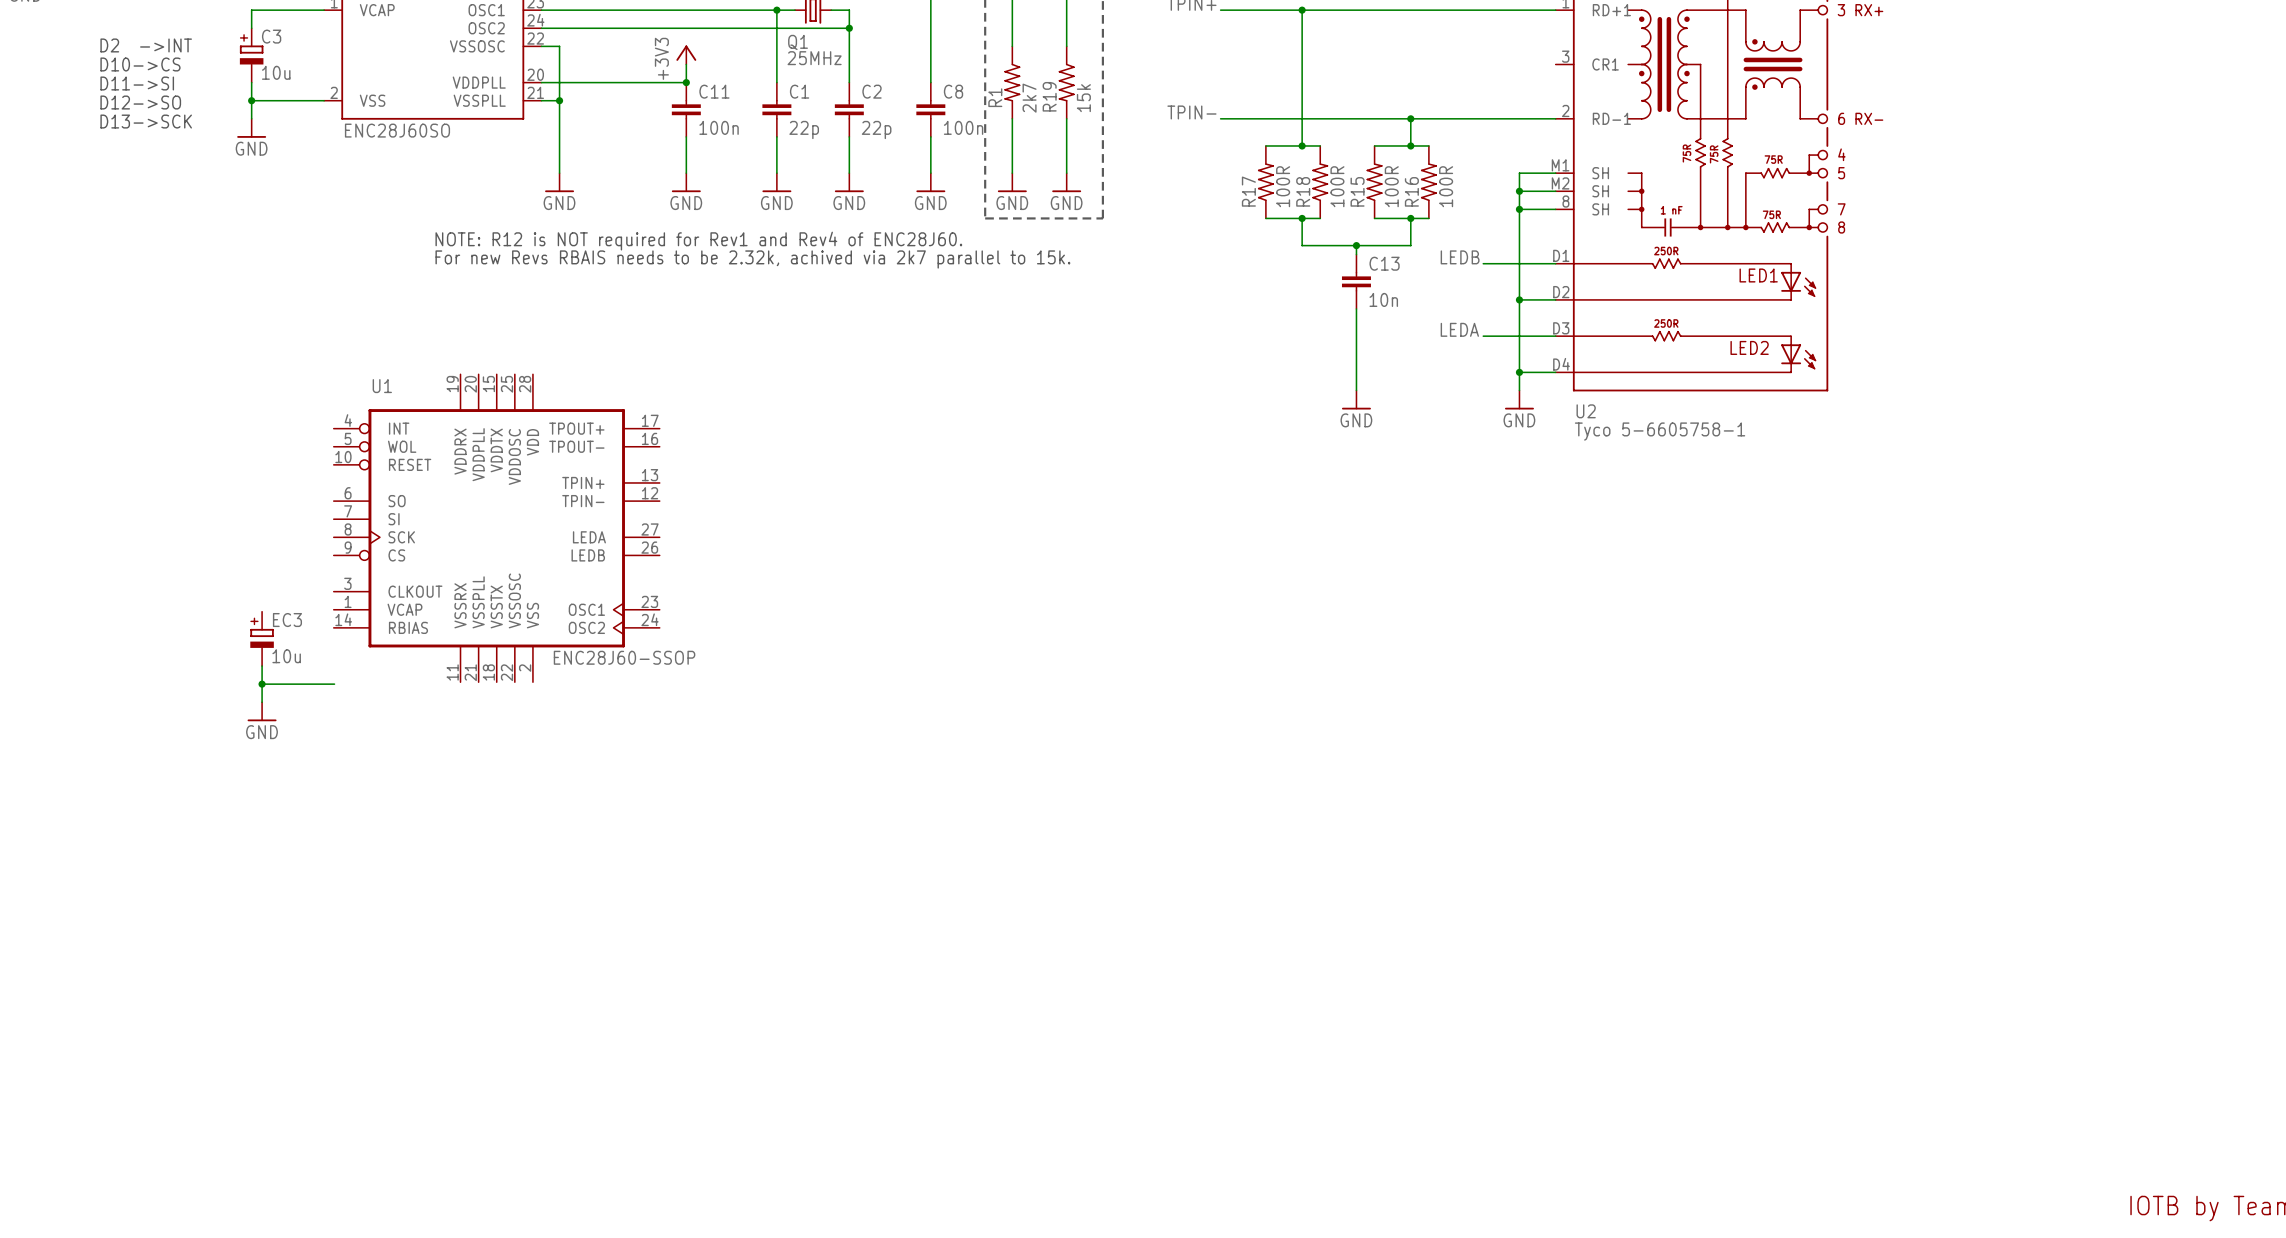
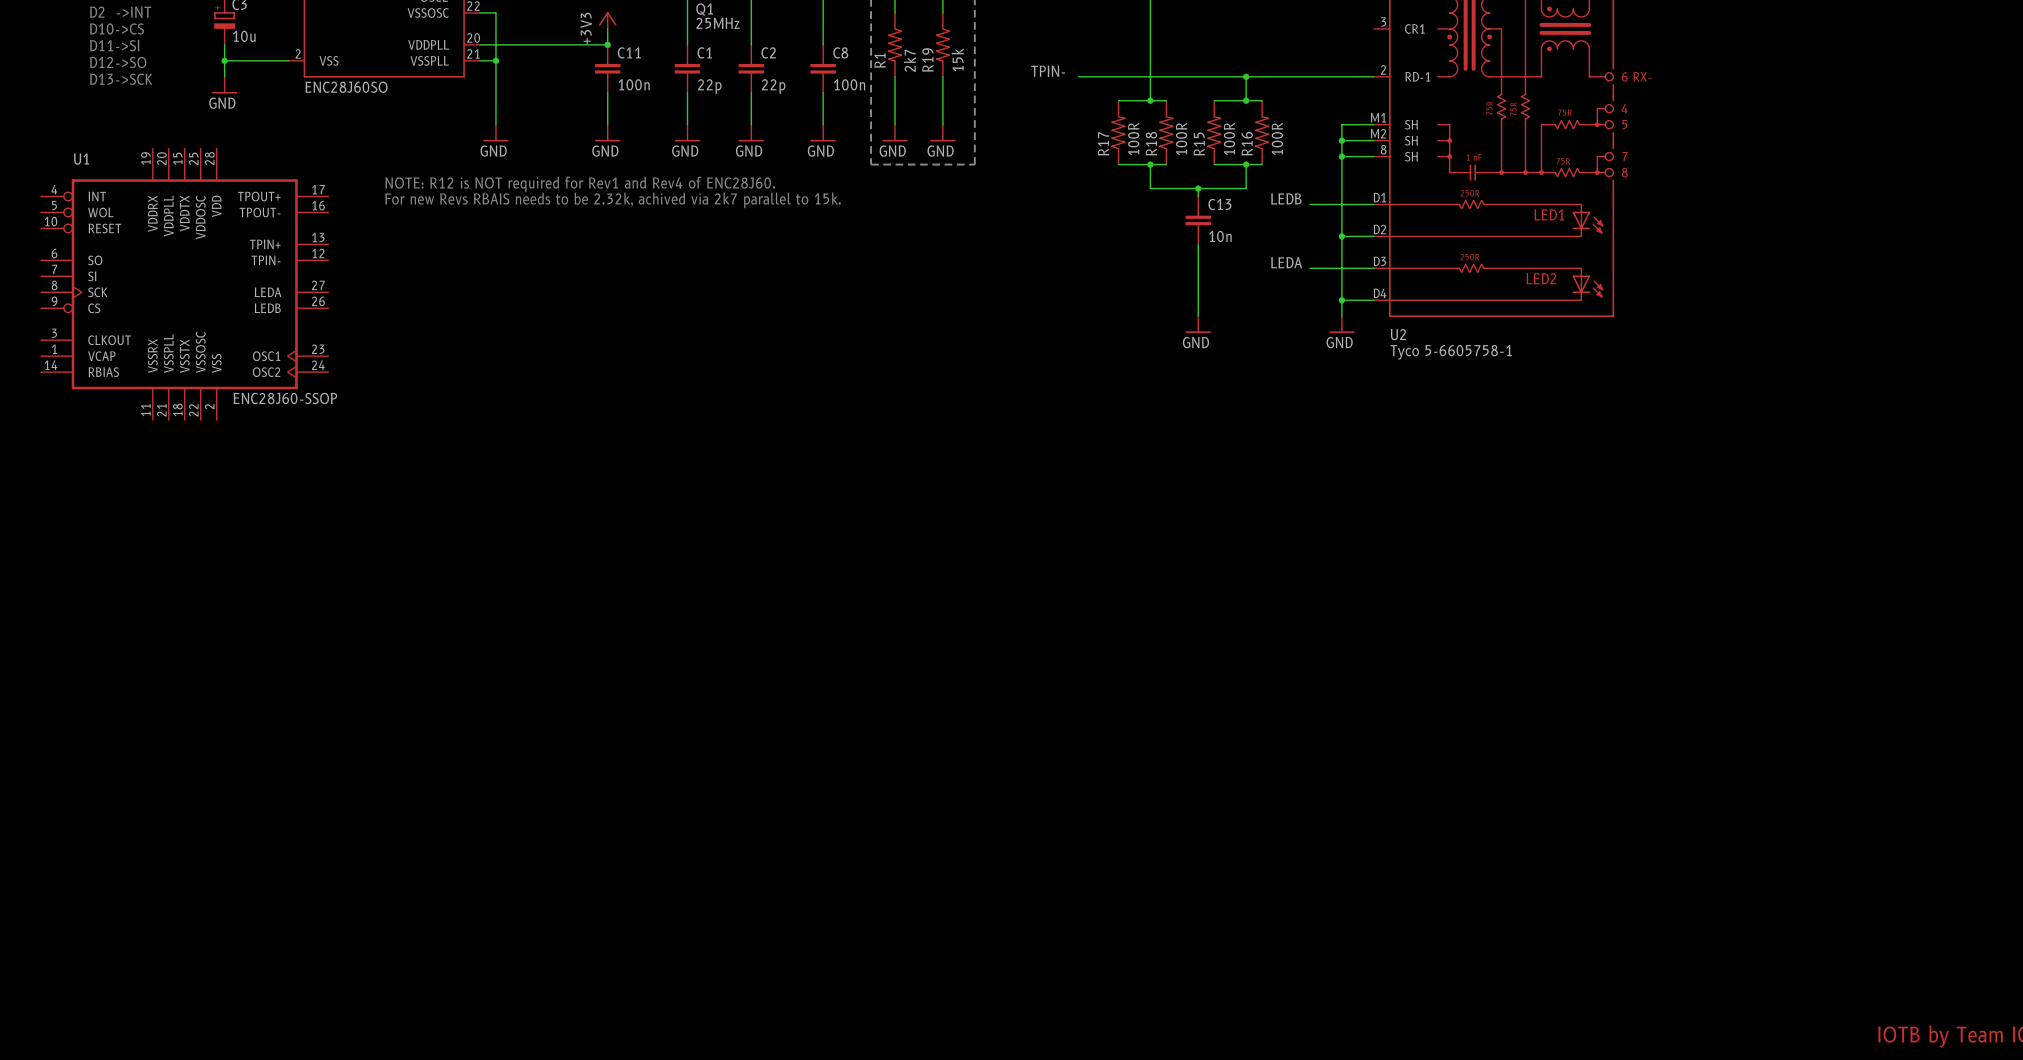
U1 position: (496, 528) -> (184, 284)
EC3: 10u (262, 638) -> none
wire: (262, 666) (262, 702) -> none
wire: (262, 684) (334, 684) -> none
junction: (262, 684) -> none
power symbol: GND (262, 711) -> none

